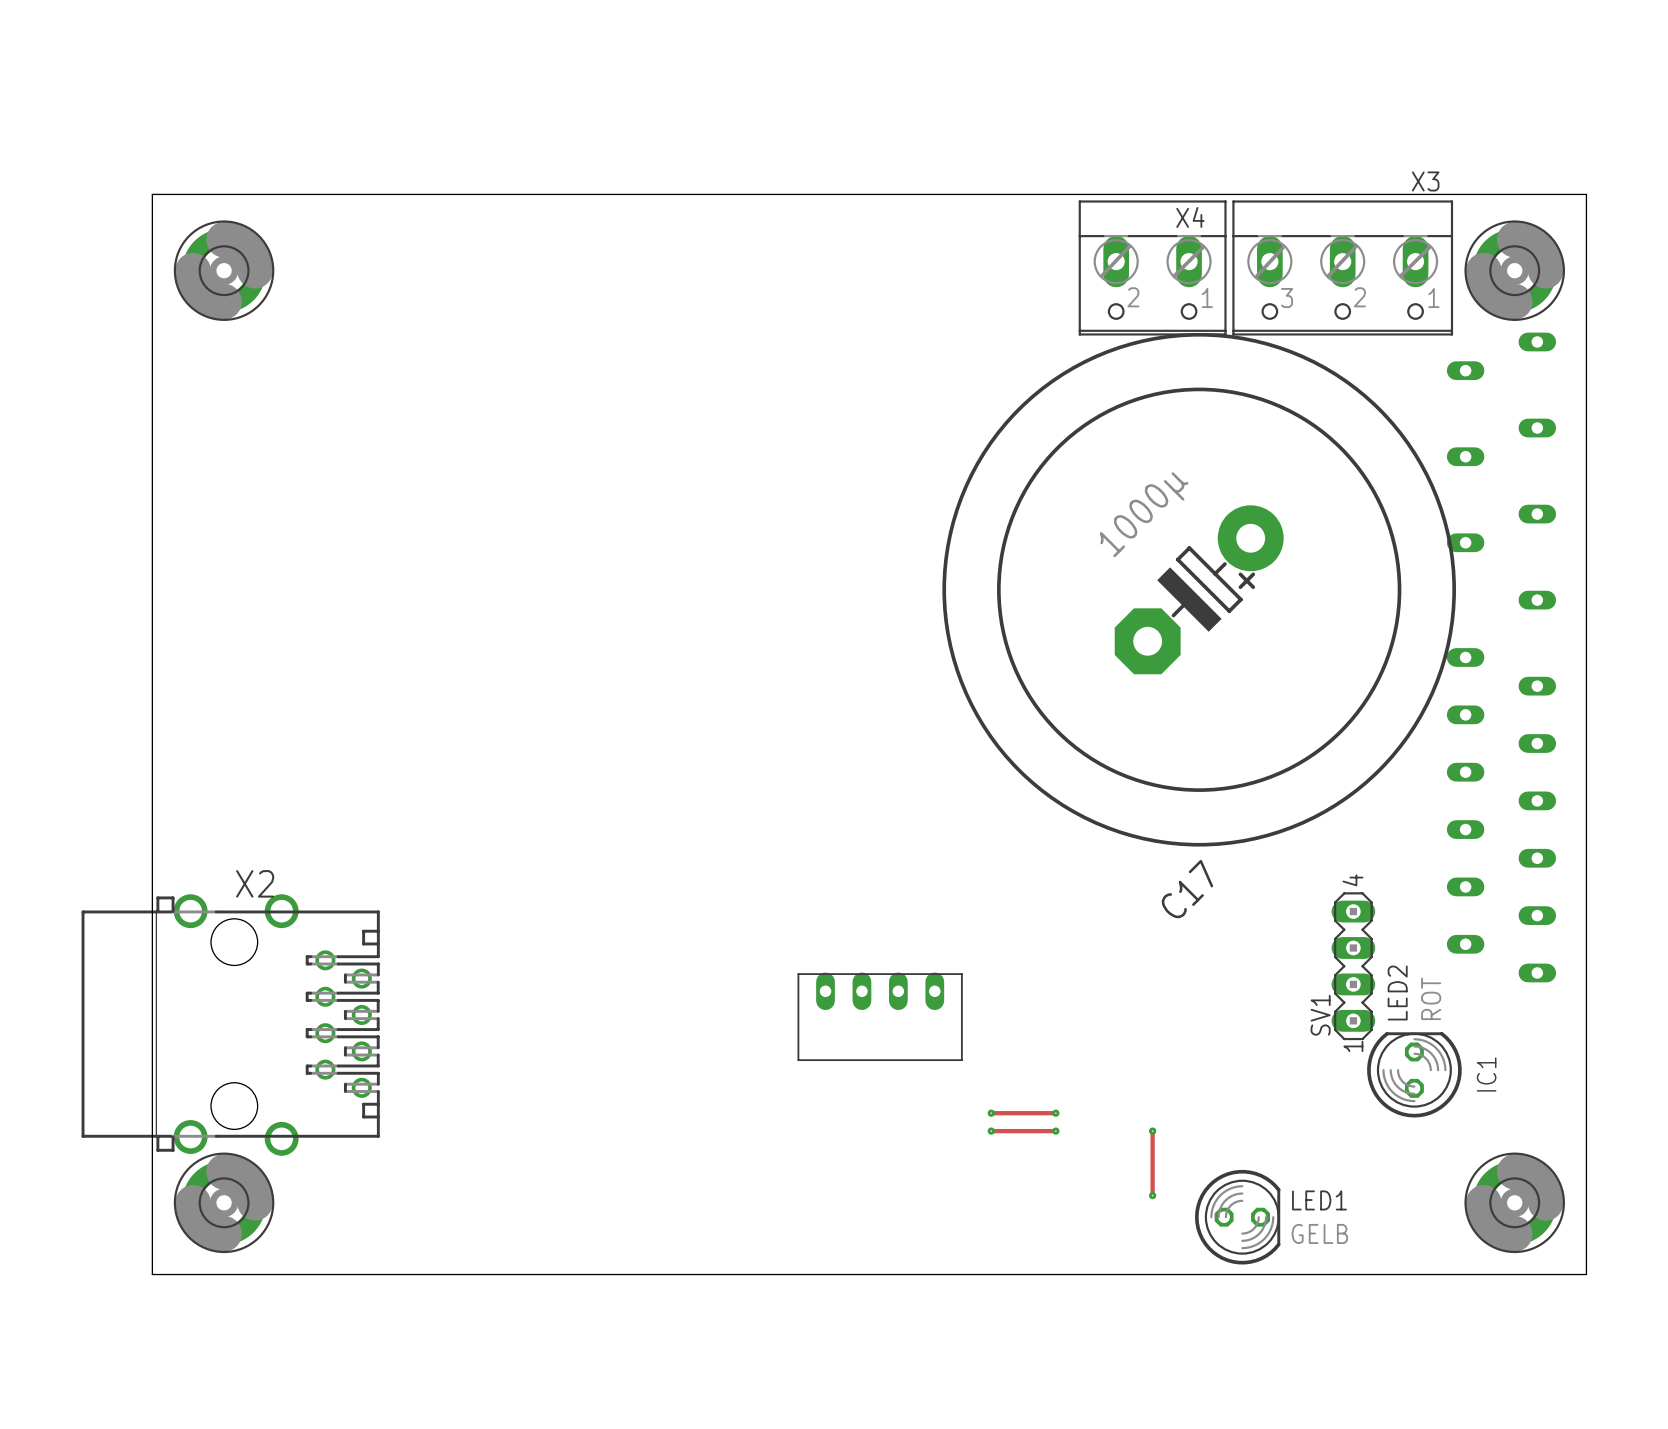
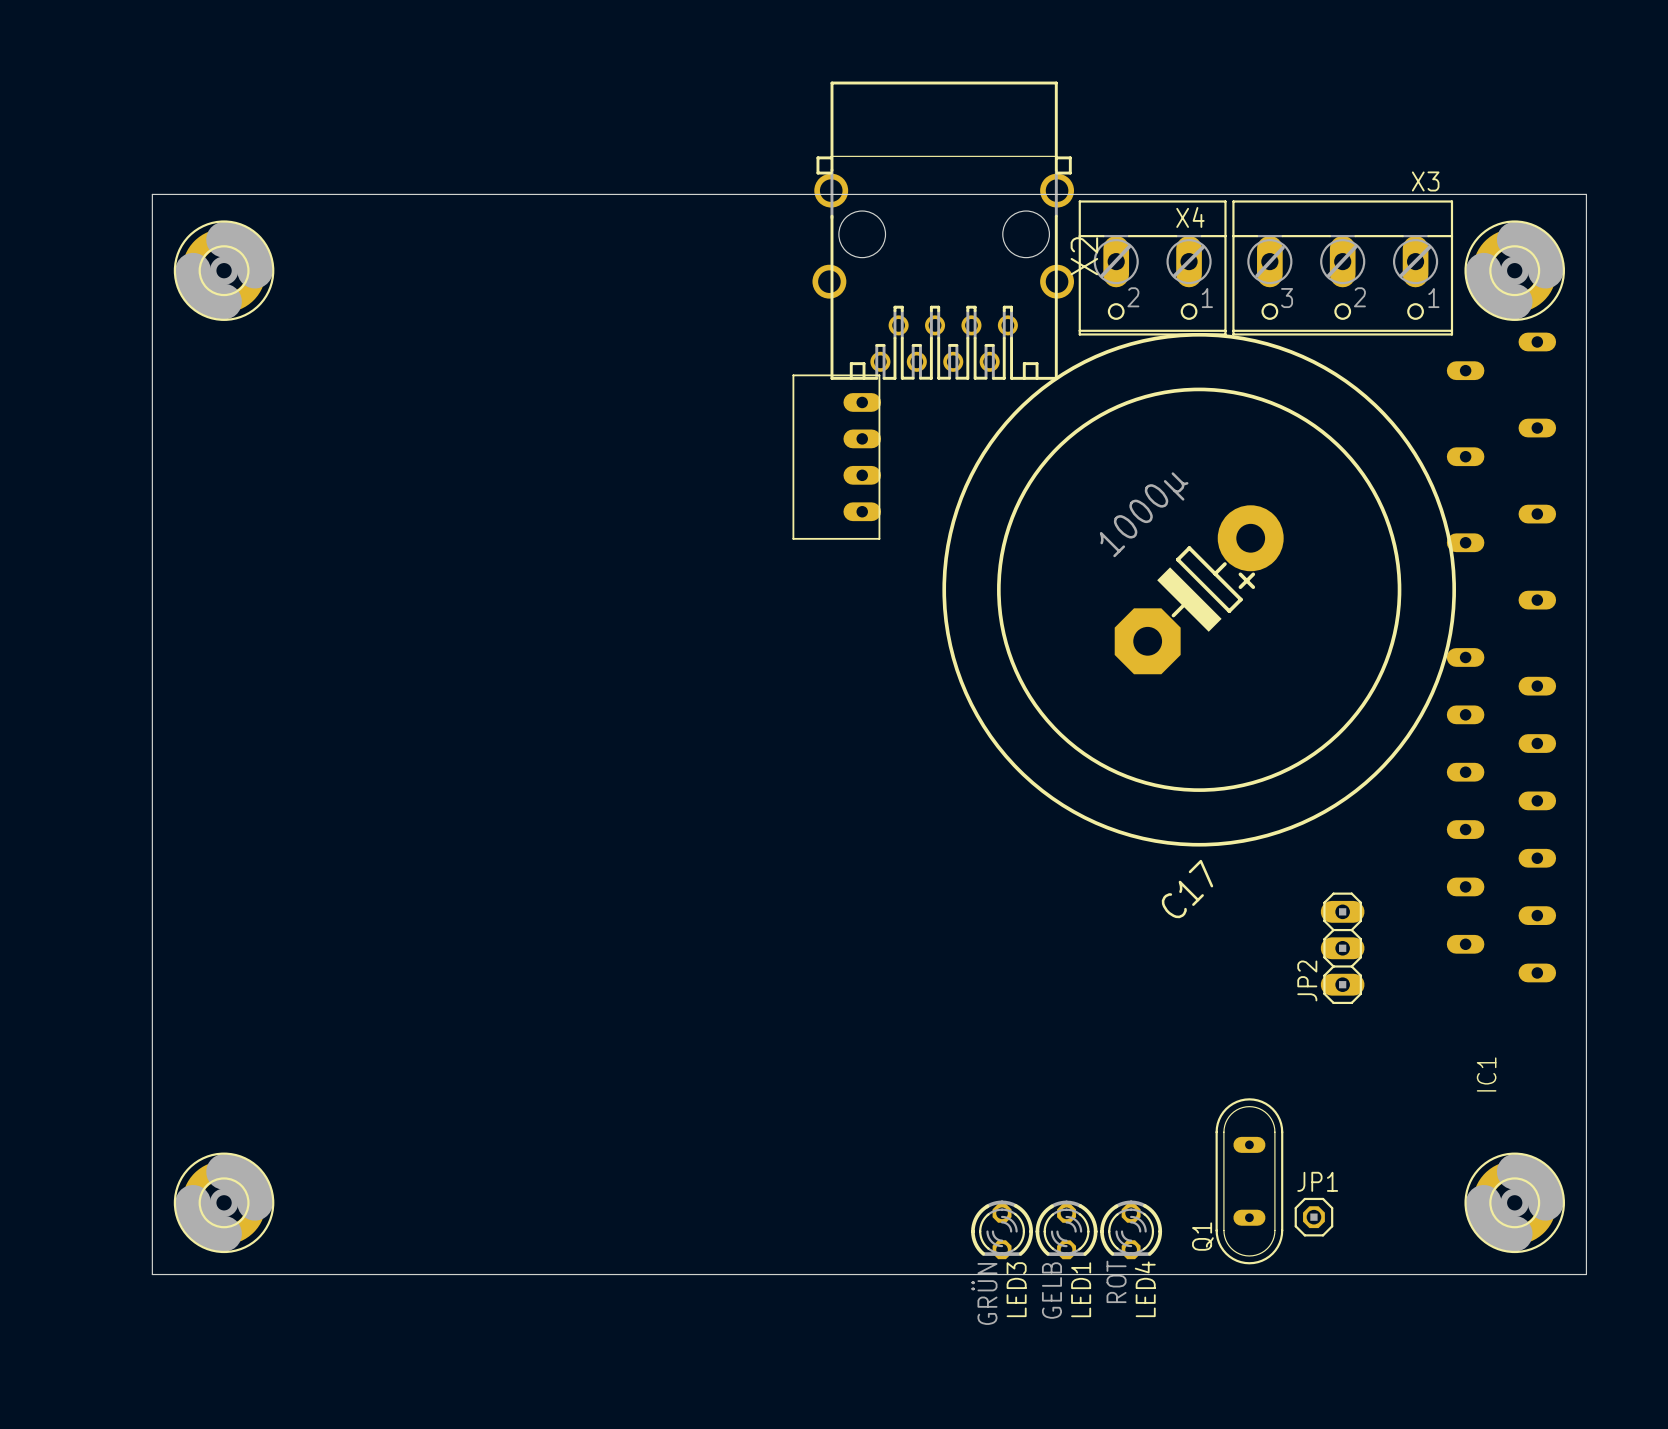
part: none -> (836, 457)
JP2: none -> (1342, 948)
SV1: (1353, 966) -> none
part: (880, 1016) -> none
X2 rotation: 0° (230, 1025) -> 90° clockwise (943, 230)
X2 position: (230, 1025) -> (943, 230)
LED2: ROT (1414, 1074) -> none
track: (991, 1113) (1055, 1113) -> none
via: (991, 1113) -> none
via: (1055, 1113) -> none
track: (991, 1131) (1055, 1131) -> none
via: (991, 1131) -> none
via: (1055, 1131) -> none
track: (1152, 1131) (1152, 1195) -> none
via: (1152, 1131) -> none
LED1 footprint: [1194, 1169, 1281, 1265] -> [1035, 1200, 1098, 1260]
Q1: none -> (1249, 1181)
via: (1152, 1195) -> none
LED1 name position: LED1 (1319, 1200) -> LED1 (1081, 1289)
JP1: none -> (1313, 1217)
LED3: none -> GRÜN (1002, 1229)
LED4: none -> ROT (1131, 1229)
LED1 value position: GELB (1319, 1233) -> GELB (1051, 1290)

